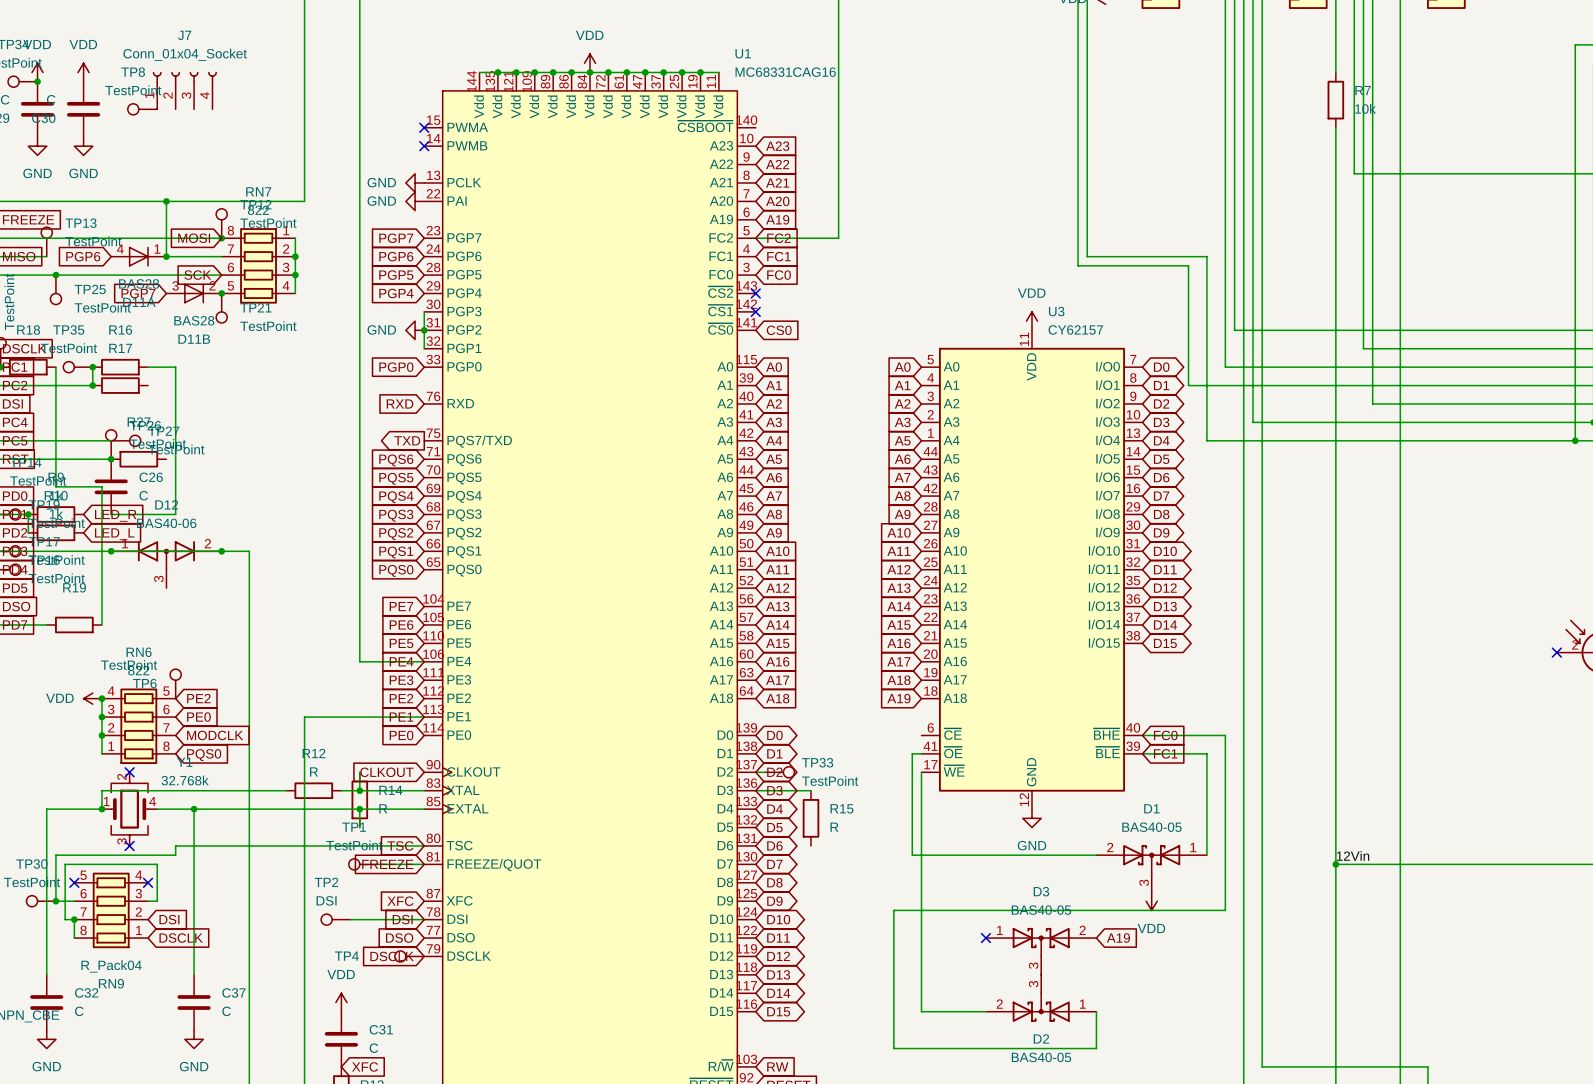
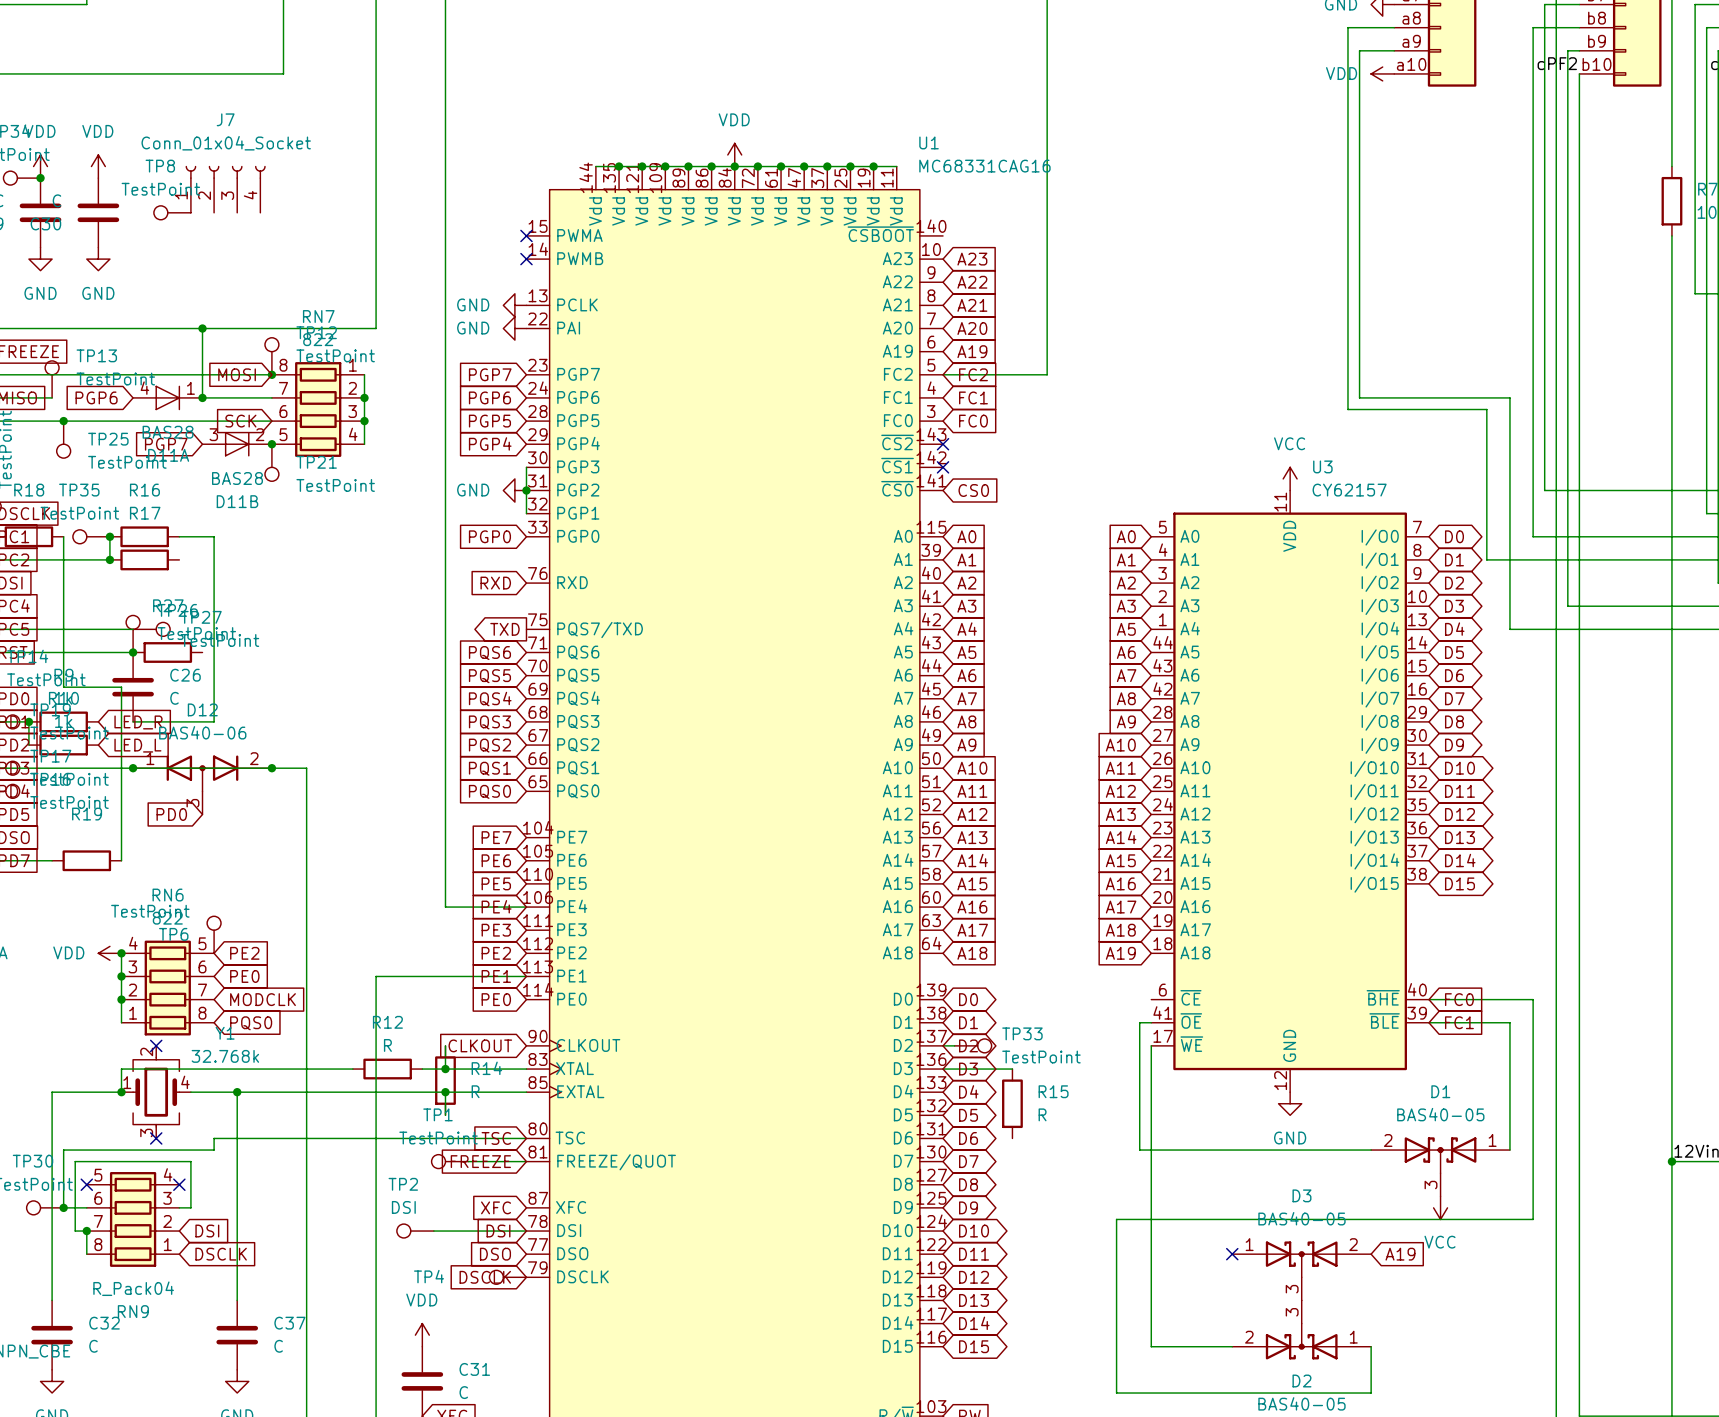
power symbol: VDD (1031, 321) -> VCC (1290, 478)
global label: none -> PD0 (171, 814)
power symbol: VDD (1151, 901) -> VCC (1440, 1207)

